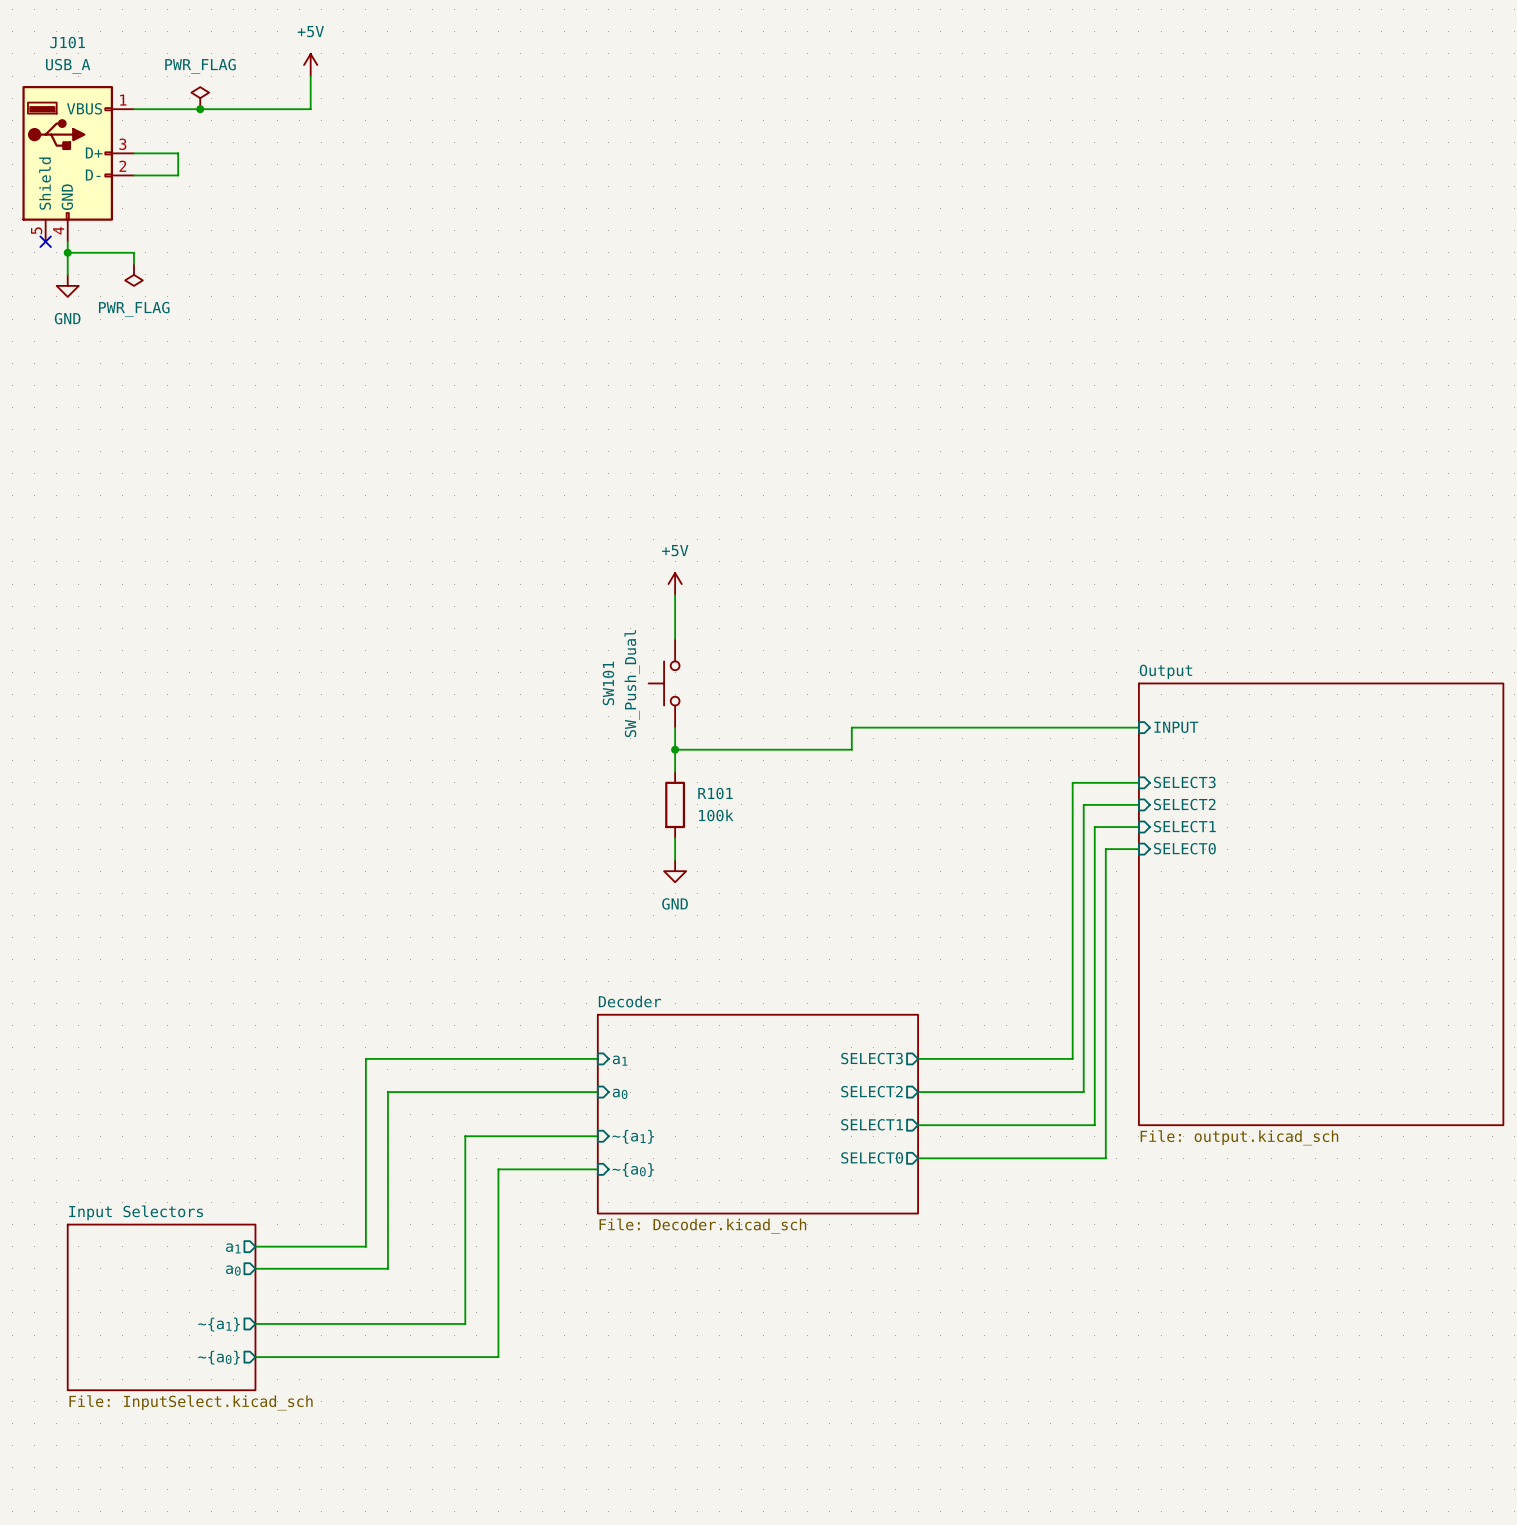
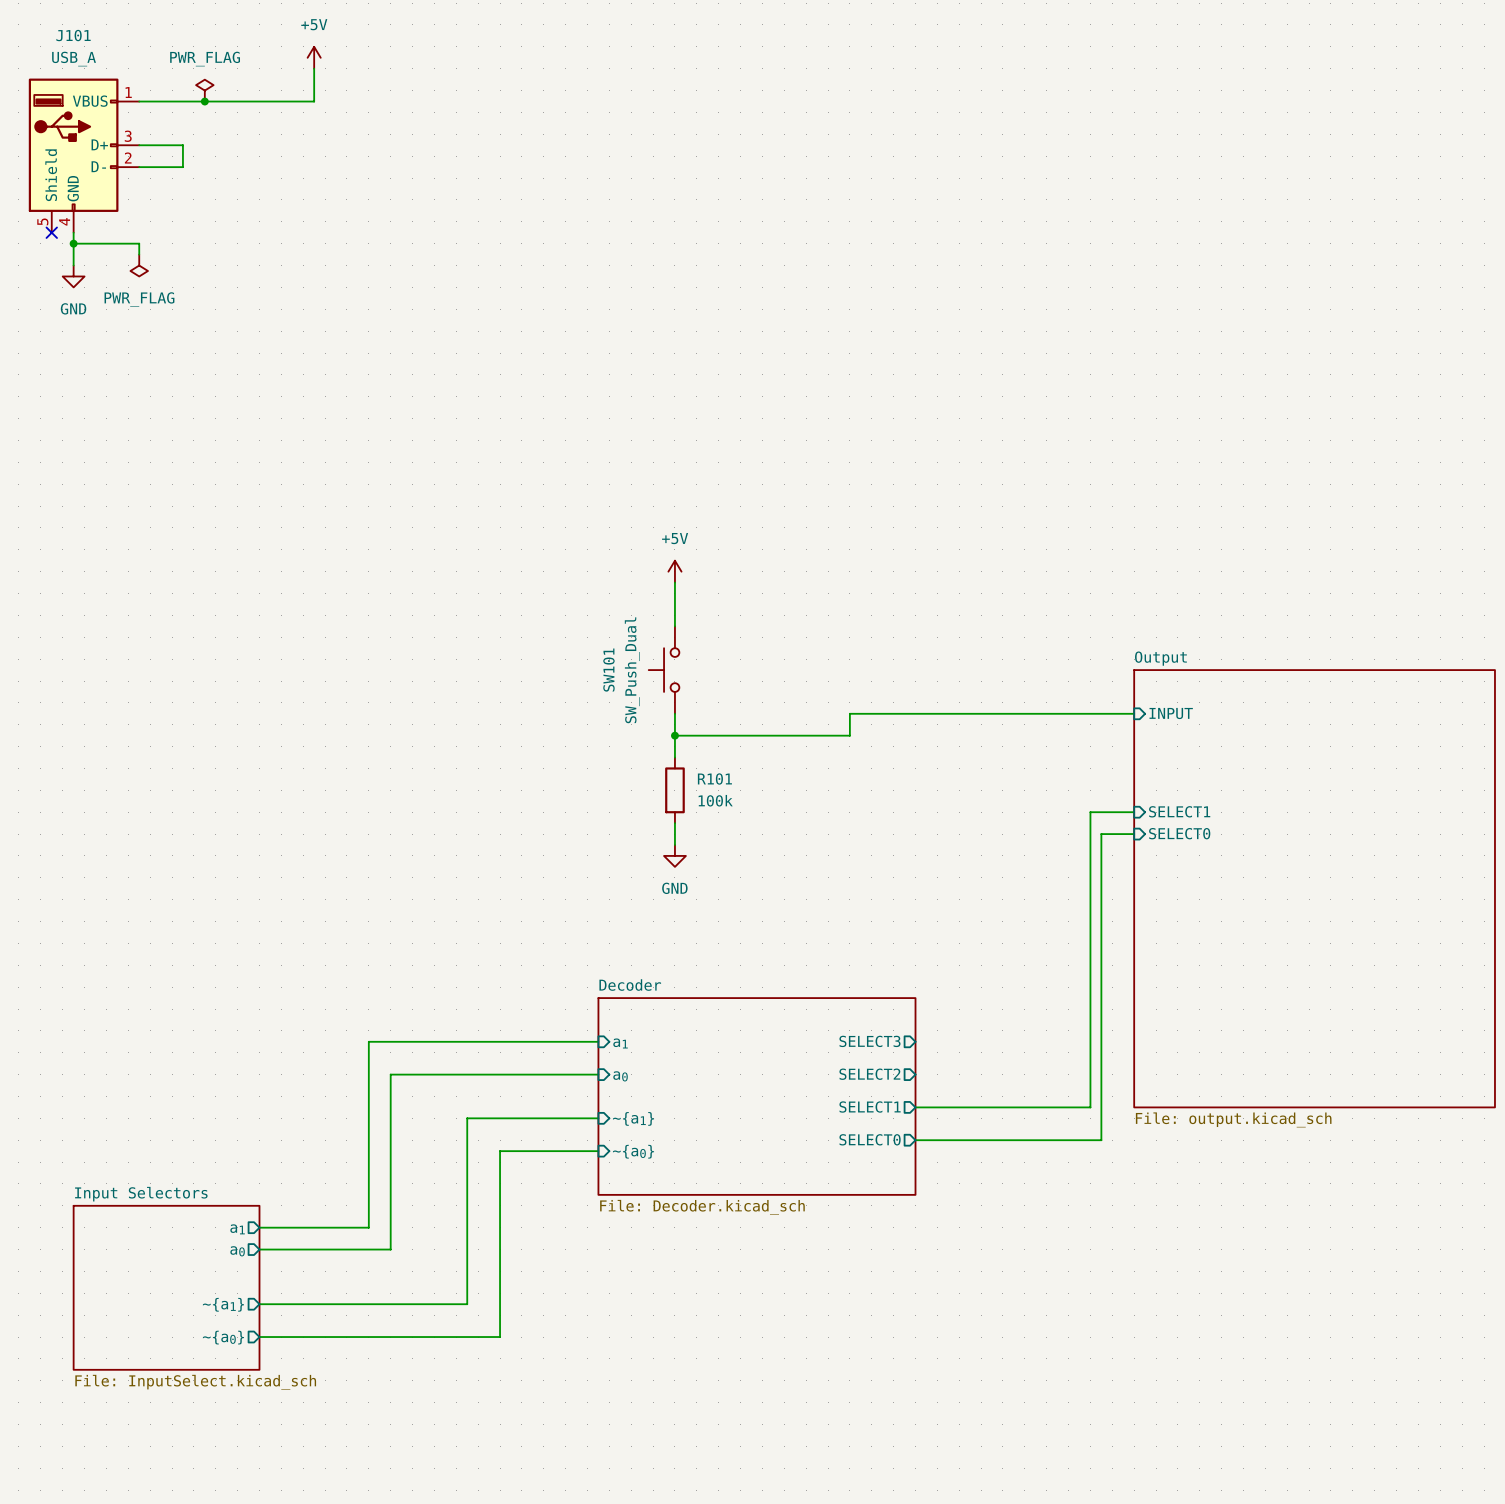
wire: (1138, 782) (1072, 782) (1072, 1058) (918, 1058) -> none
sheet pin: SELECT3 (1184, 782) -> none
wire: (1138, 804) (1083, 804) (1083, 1092) (918, 1092) -> none
sheet pin: SELECT2 (1184, 804) -> none

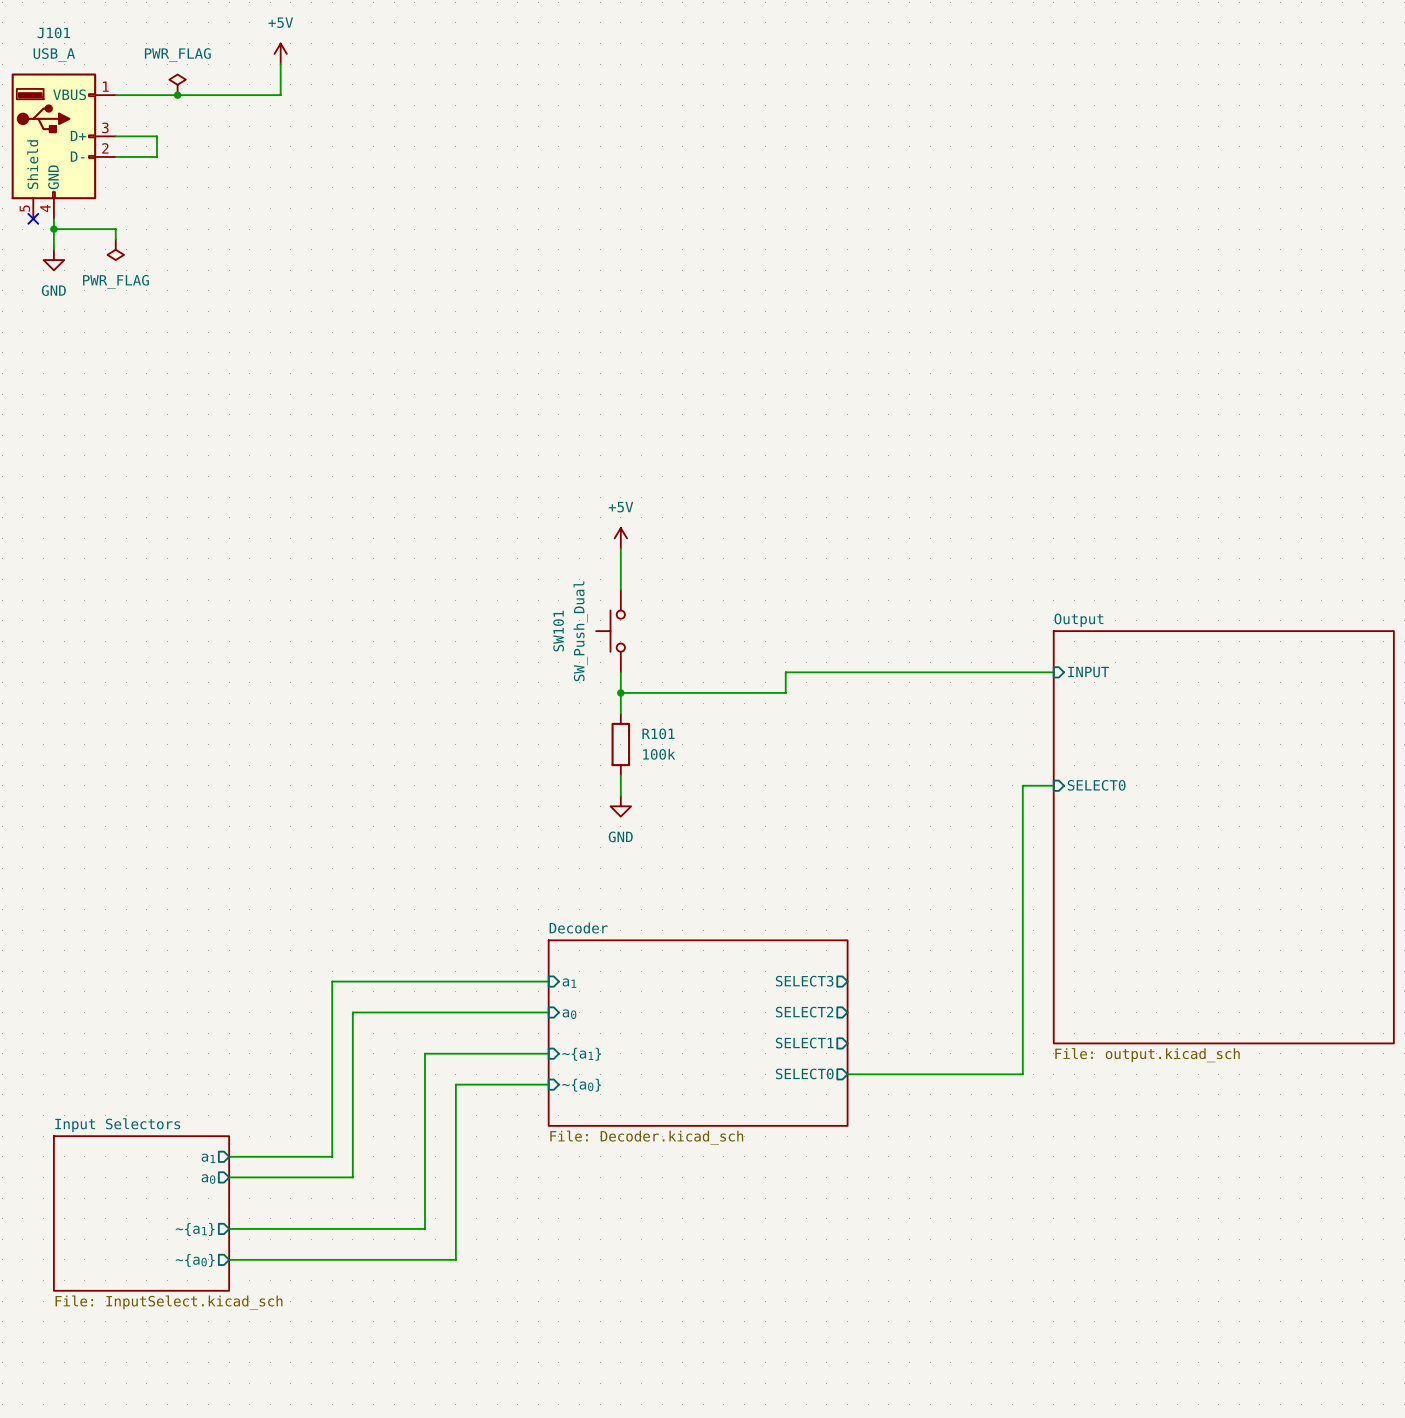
sheet pin: SELECT1 (1179, 811) -> none
wire: (1134, 812) (1090, 812) (1090, 1107) (915, 1107) -> none

